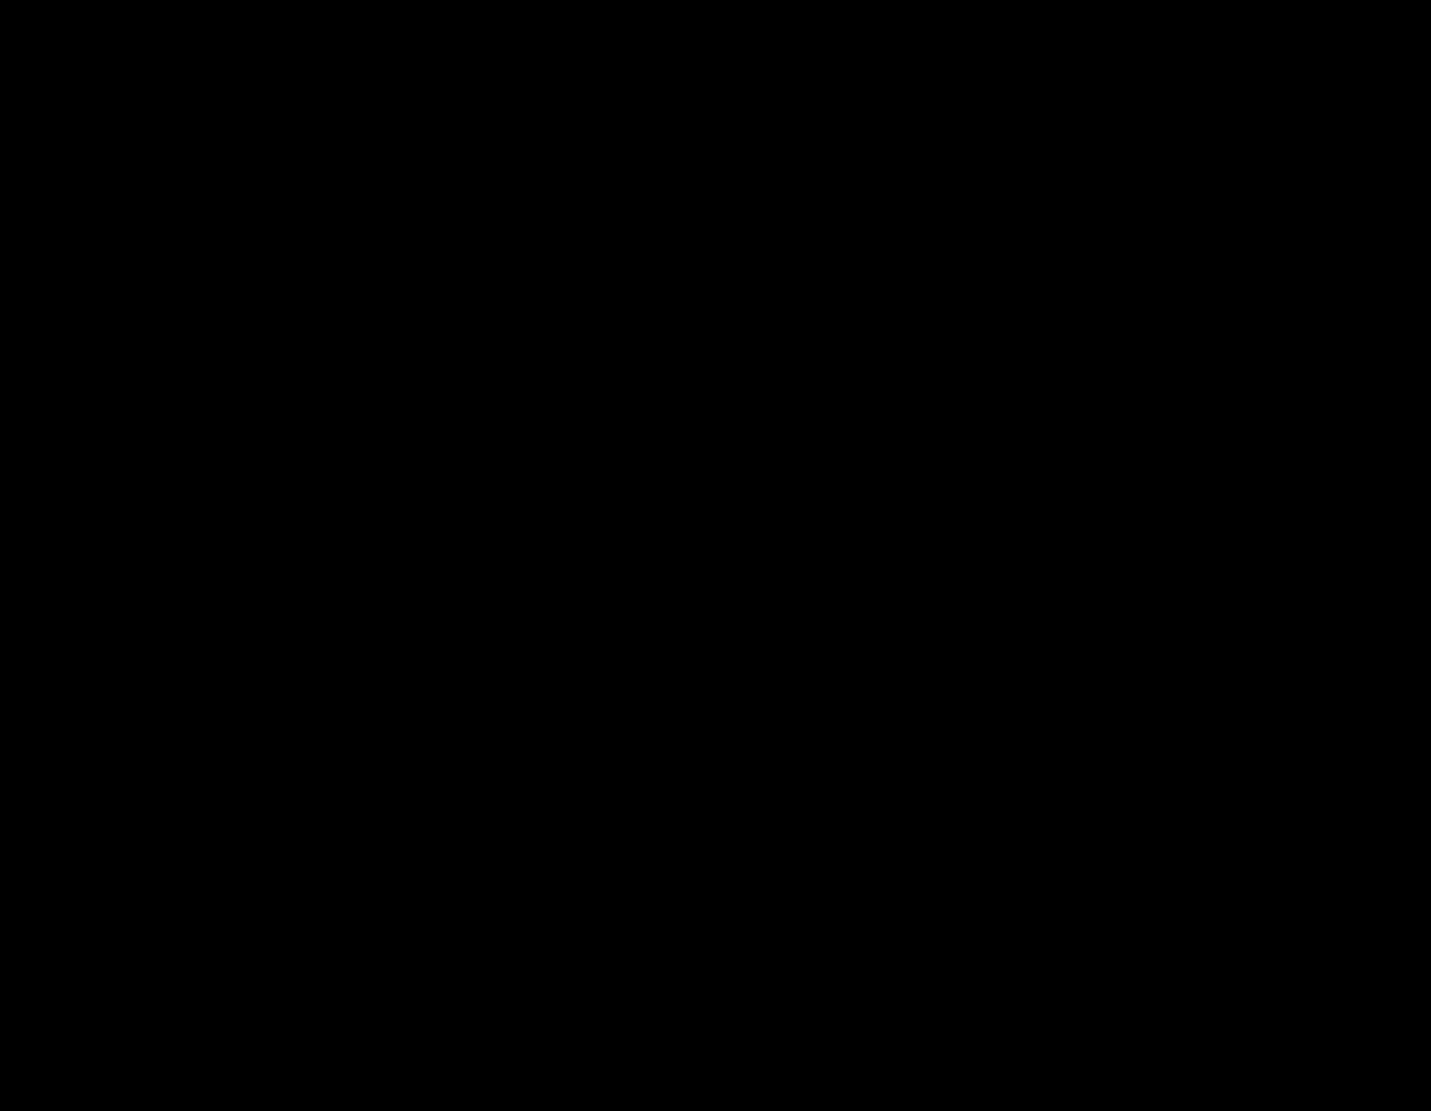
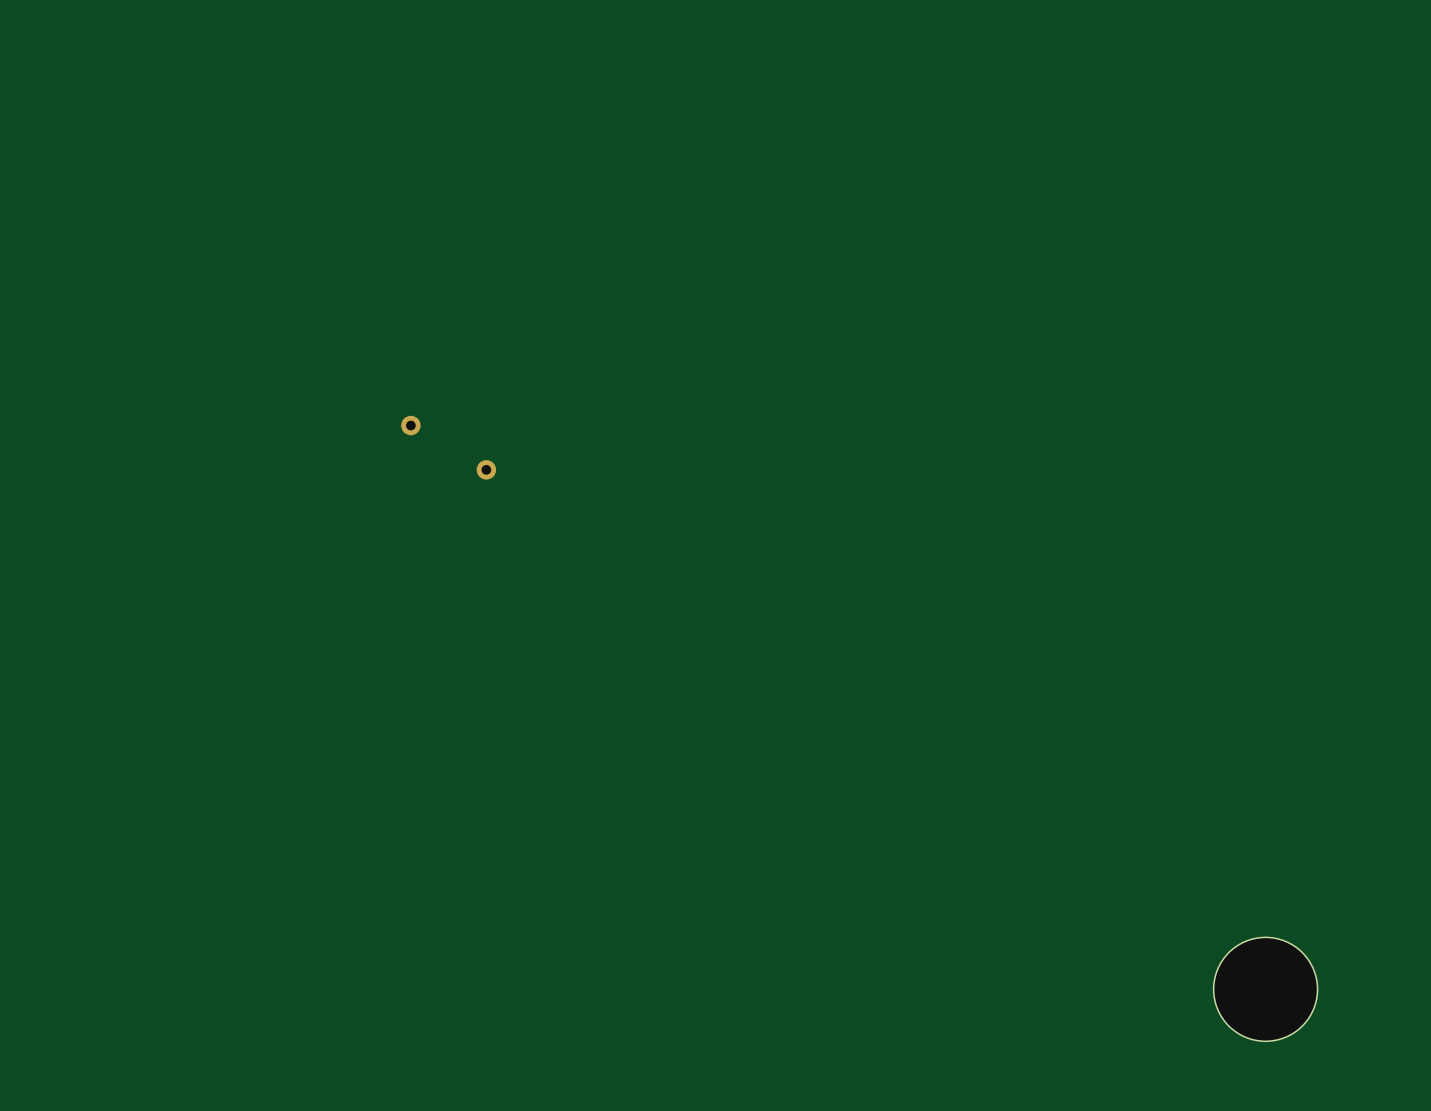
via: none -> (410, 425)
via: none -> (486, 469)
part: none -> (1265, 989)

